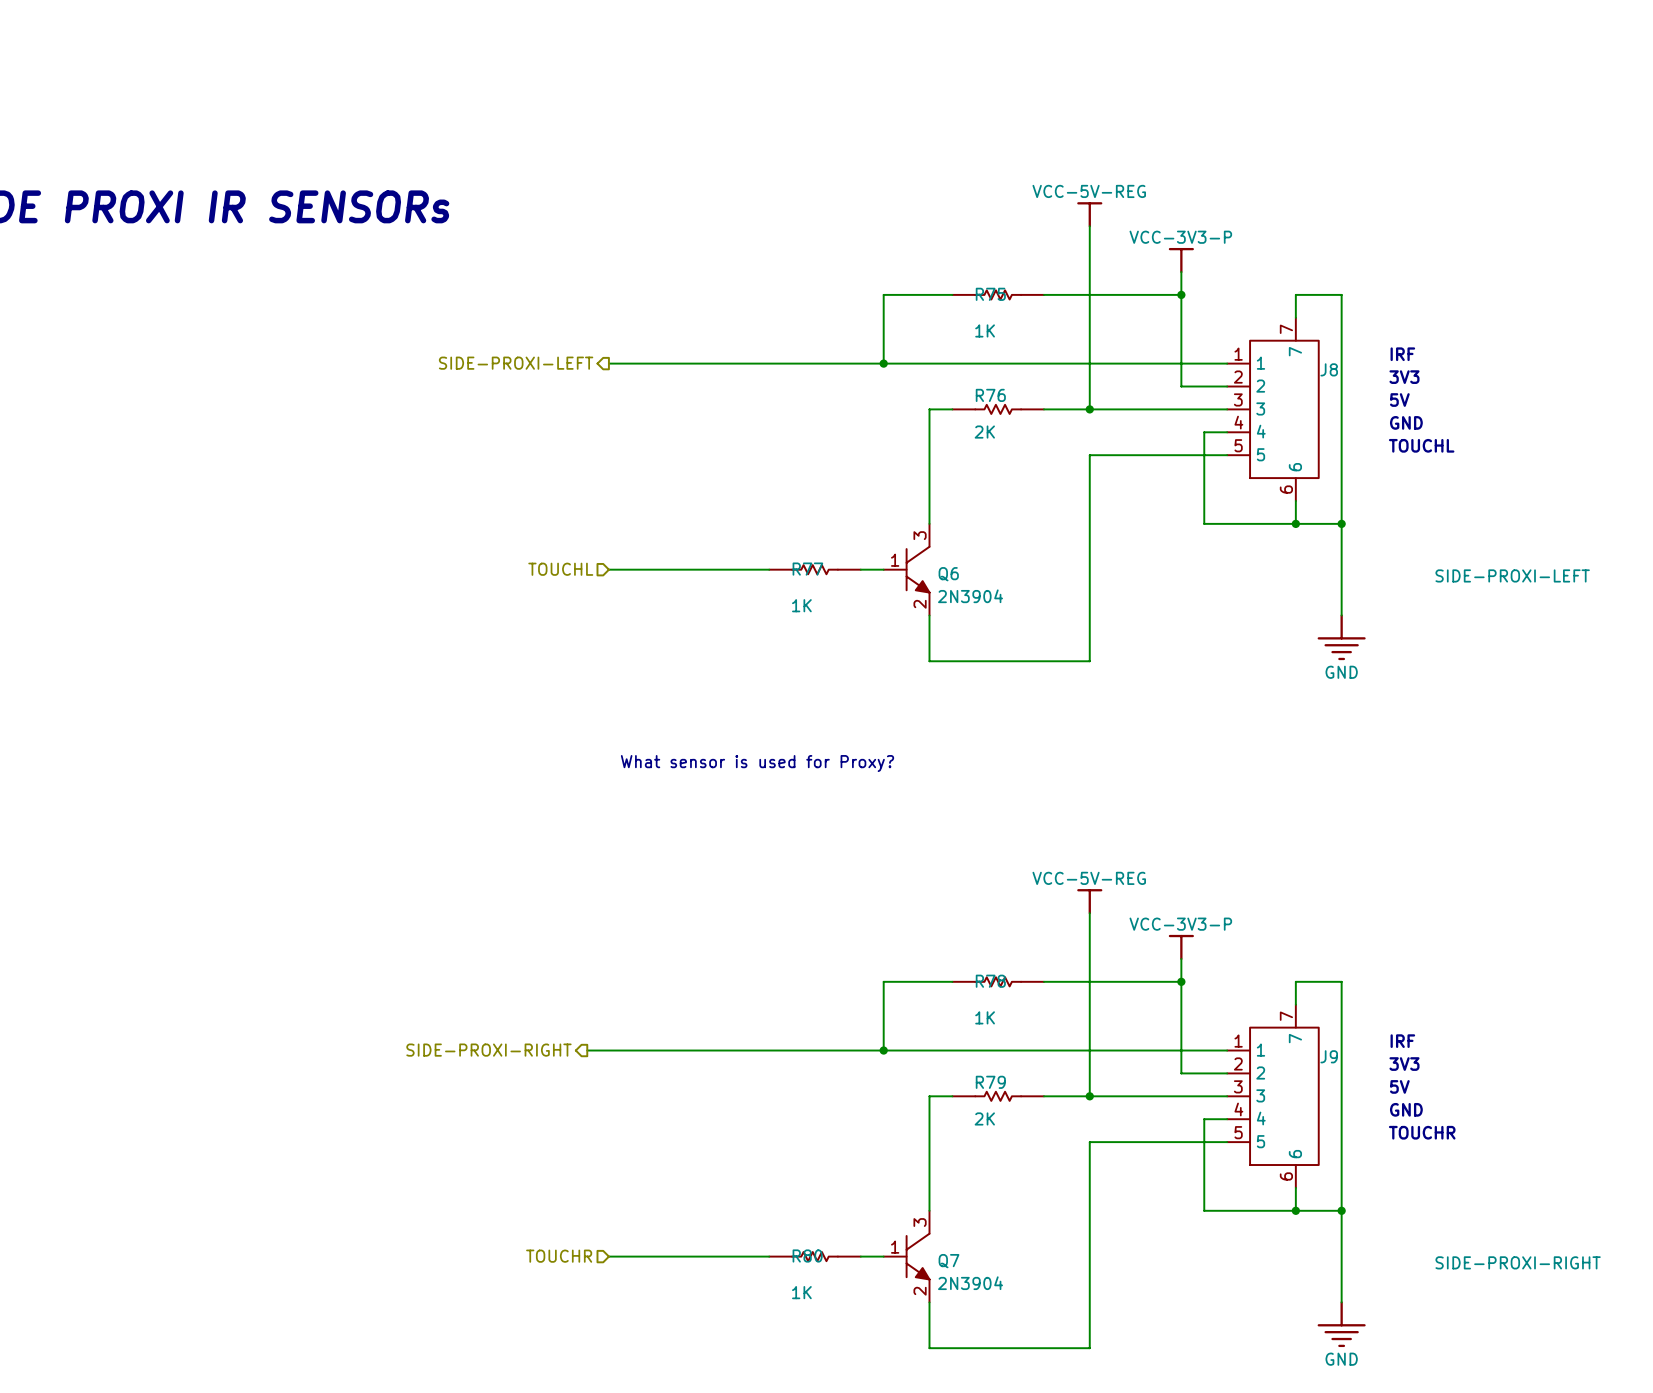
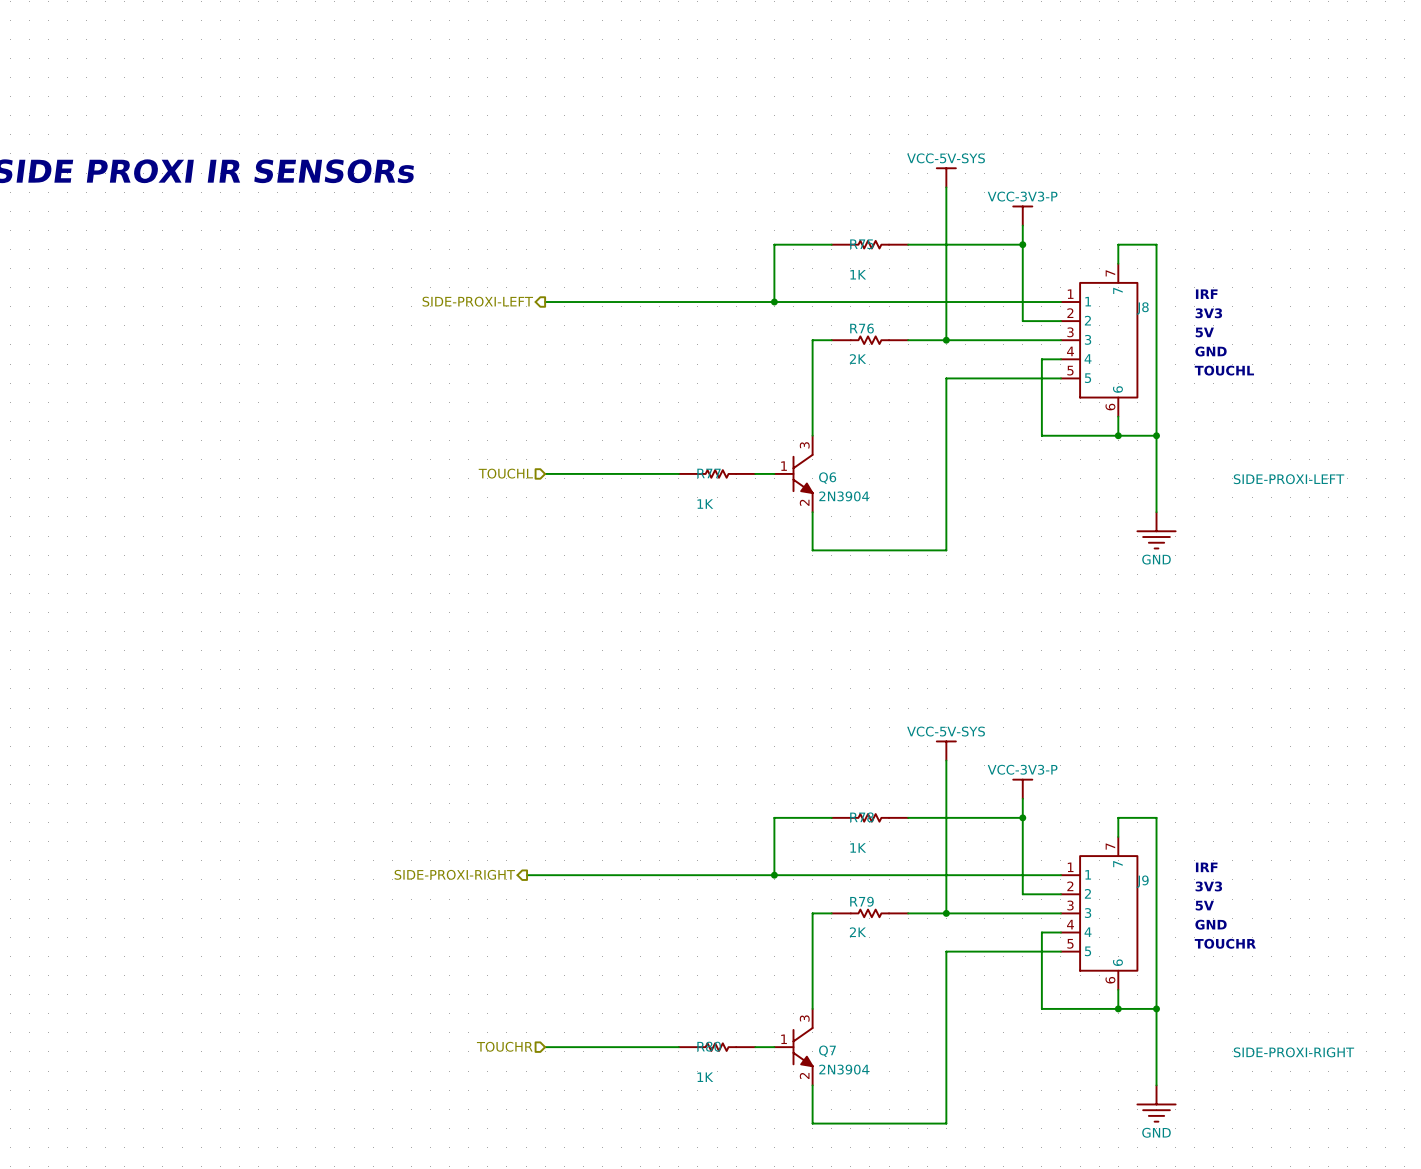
power symbol: VCC-5V-REG (1089, 214) -> VCC-5V-SYS (946, 177)
text: What sensor is used for Proxy? (757, 763) -> none
power symbol: VCC-5V-REG (1089, 901) -> VCC-5V-SYS (946, 751)

